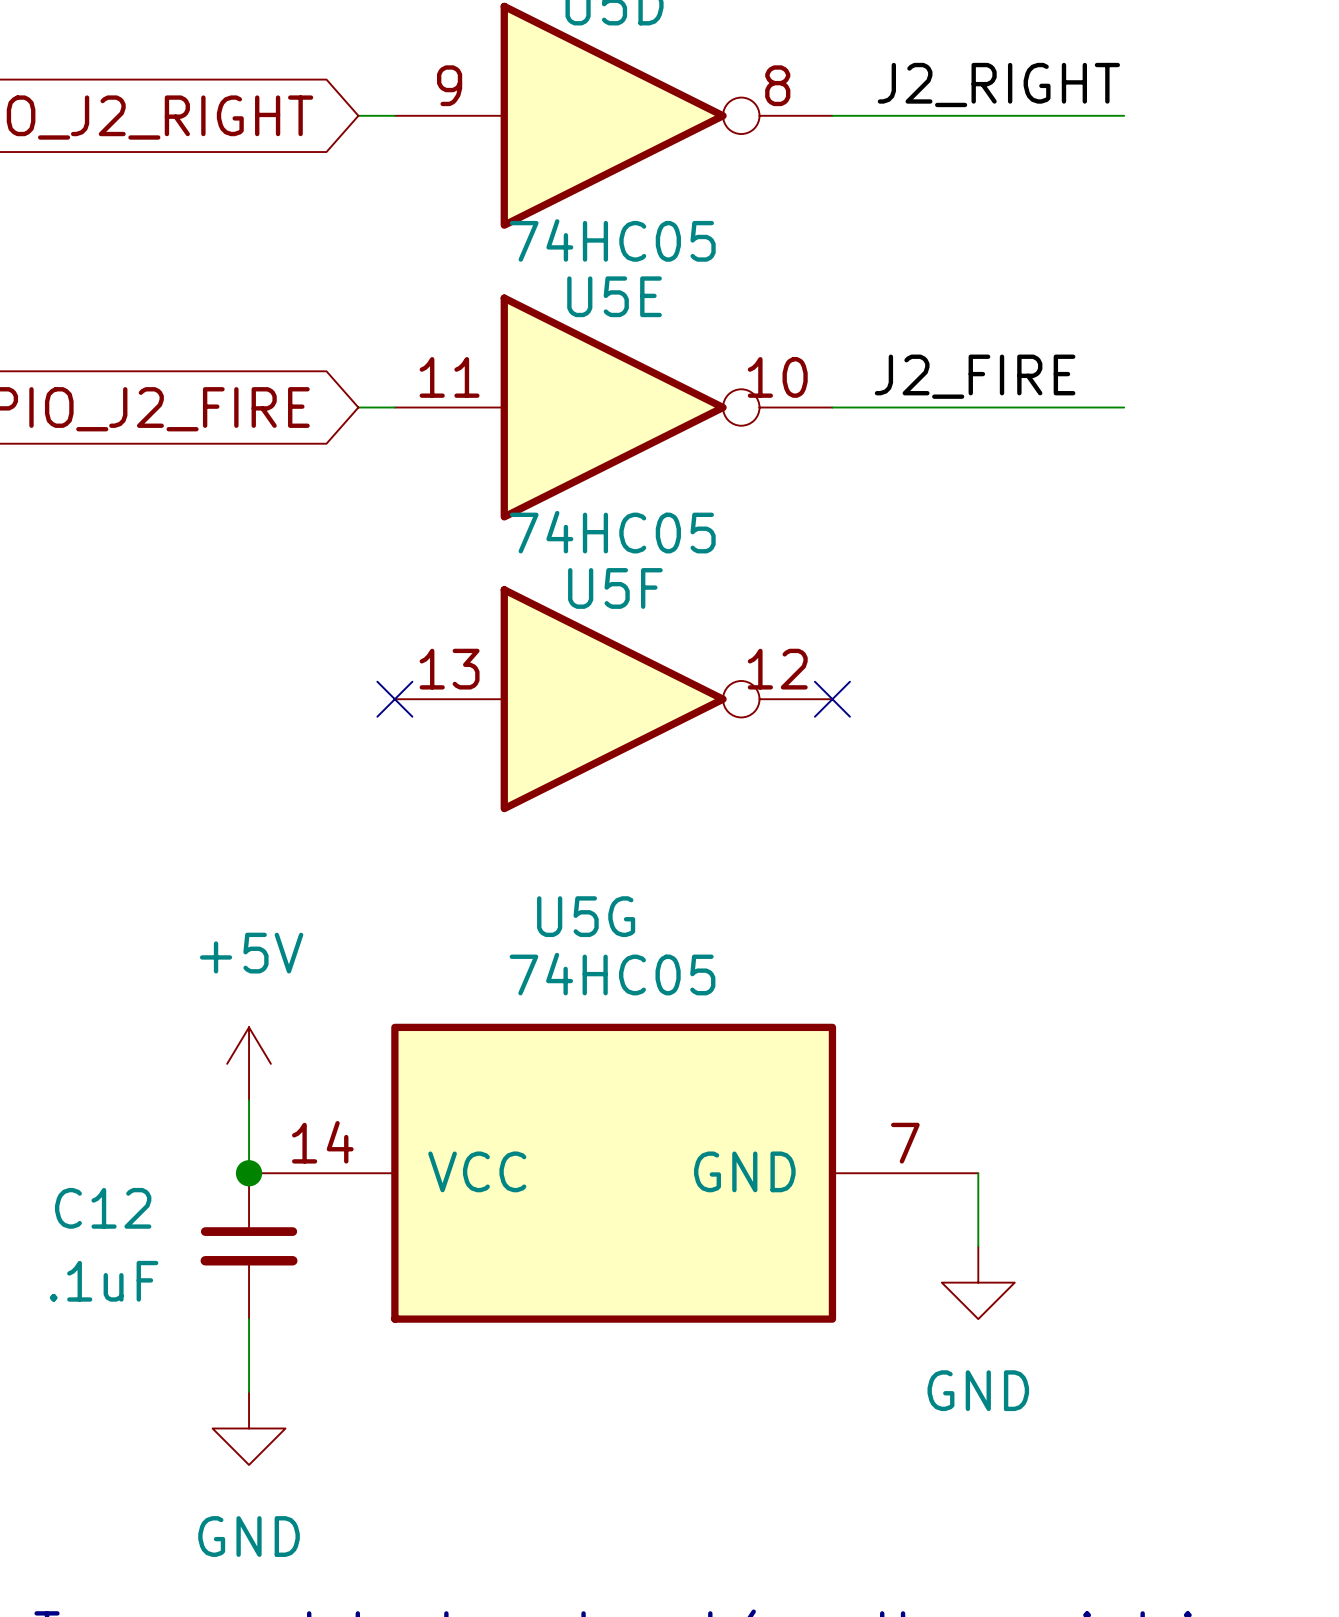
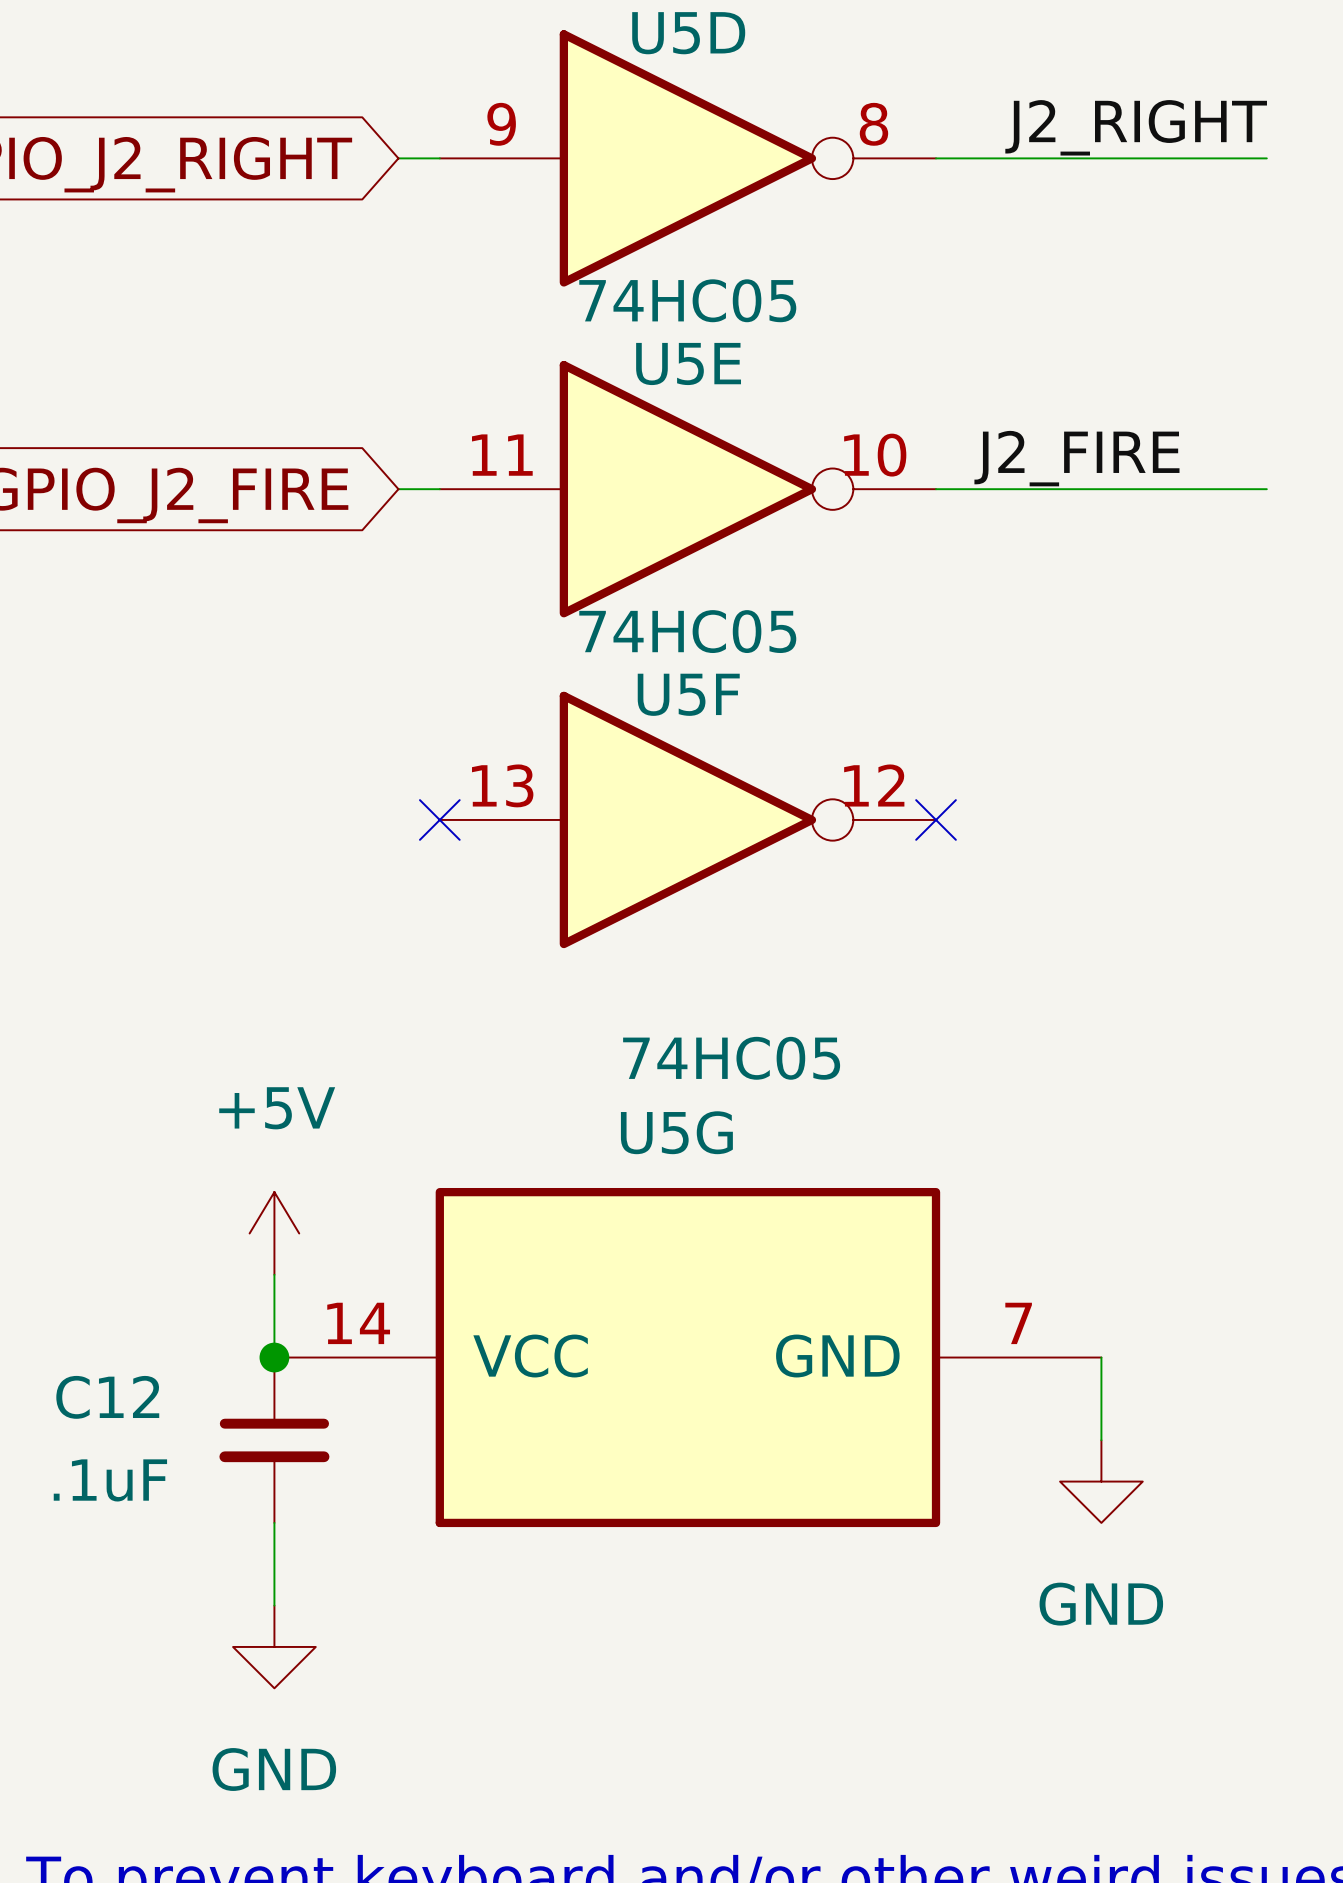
U5G name position: U5G (586, 916) -> U5G (676, 1132)
U5G value position: 74HC05 (612, 974) -> 74HC05 (731, 1058)

